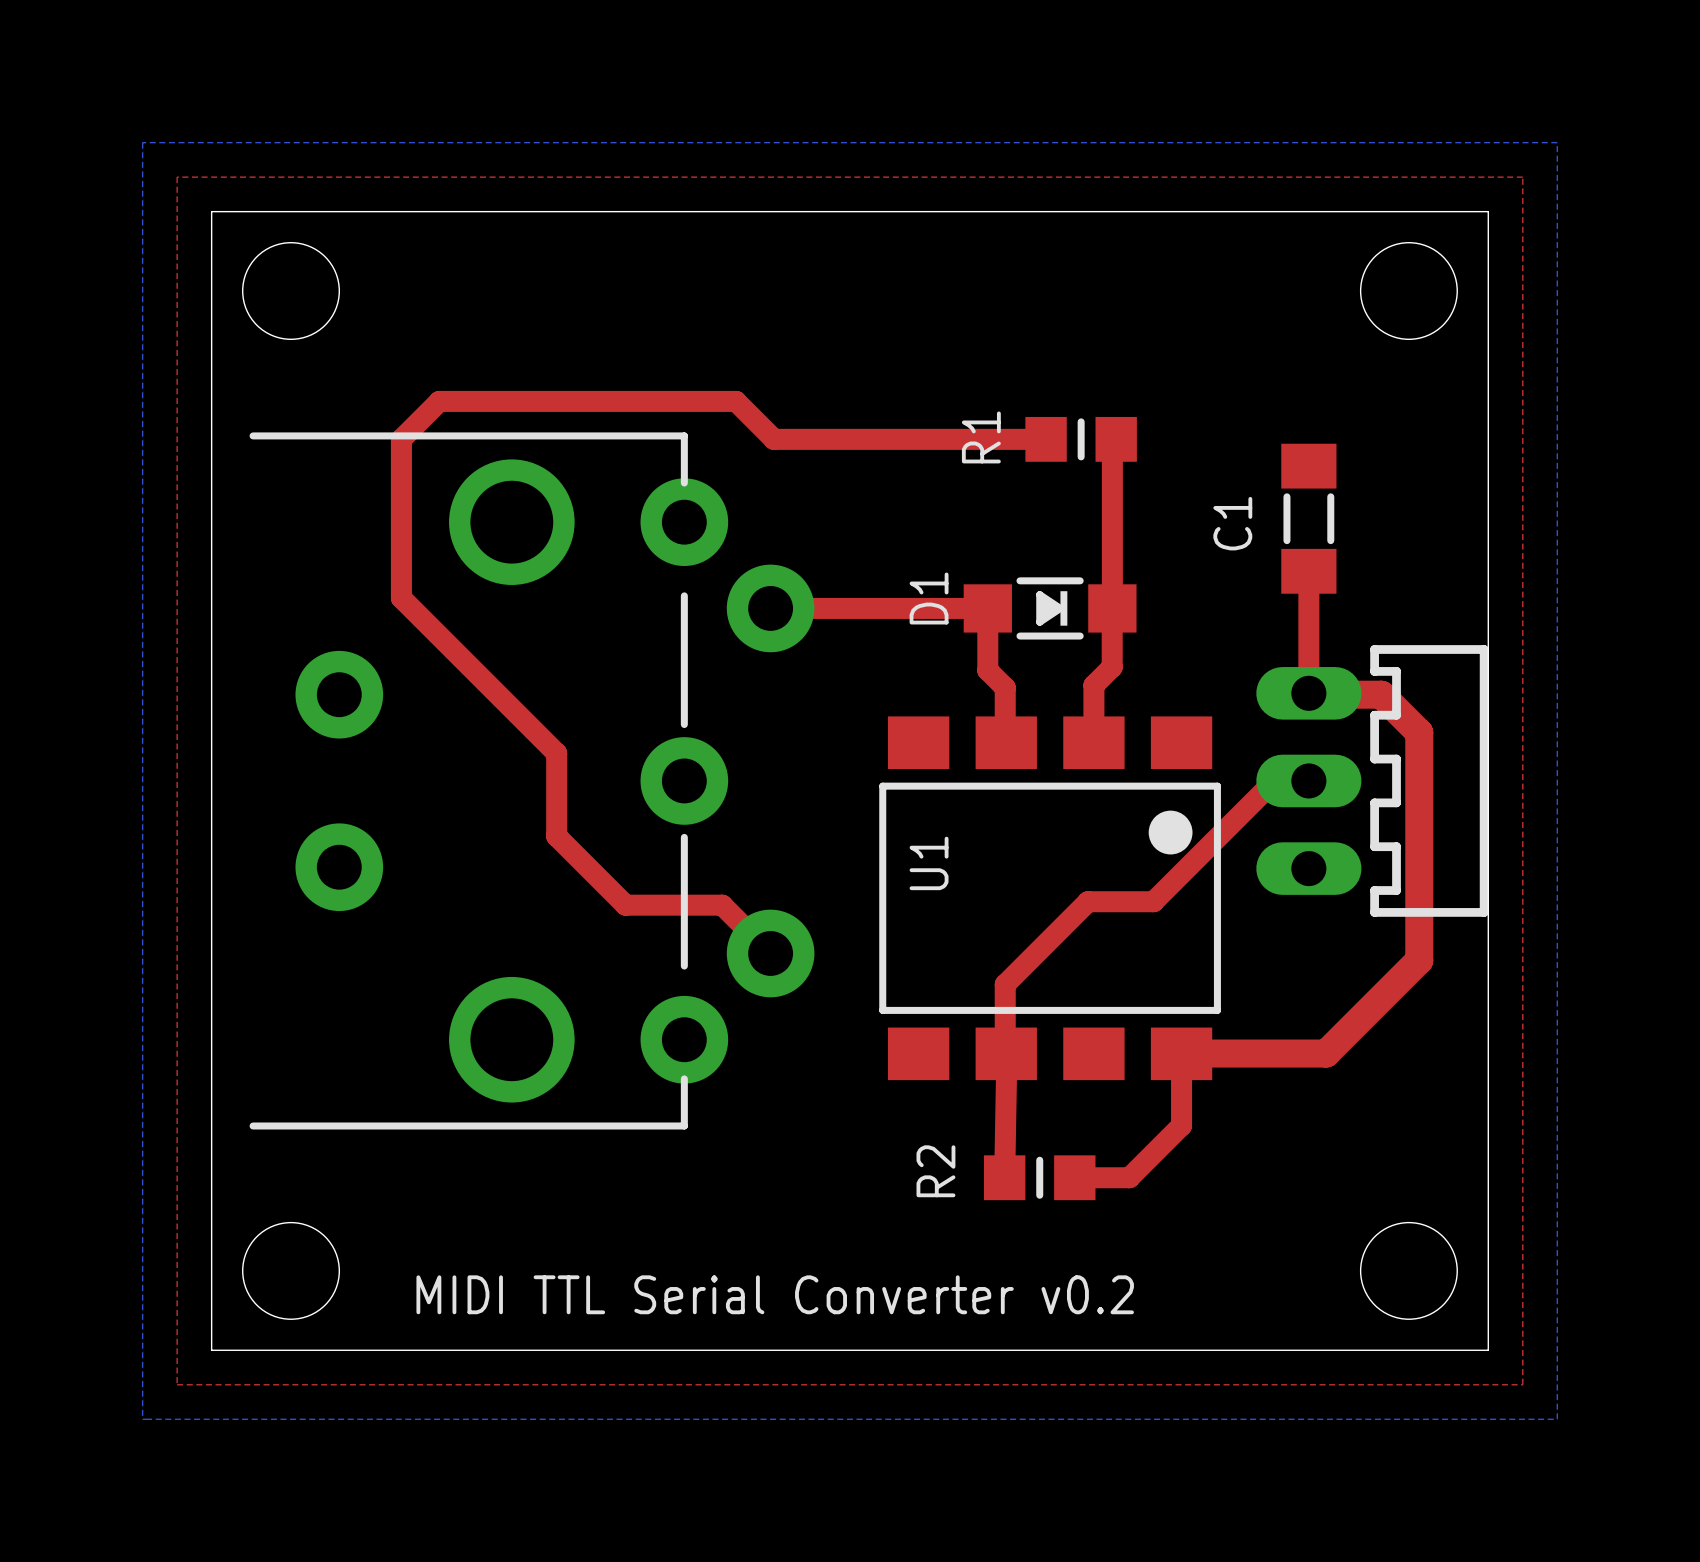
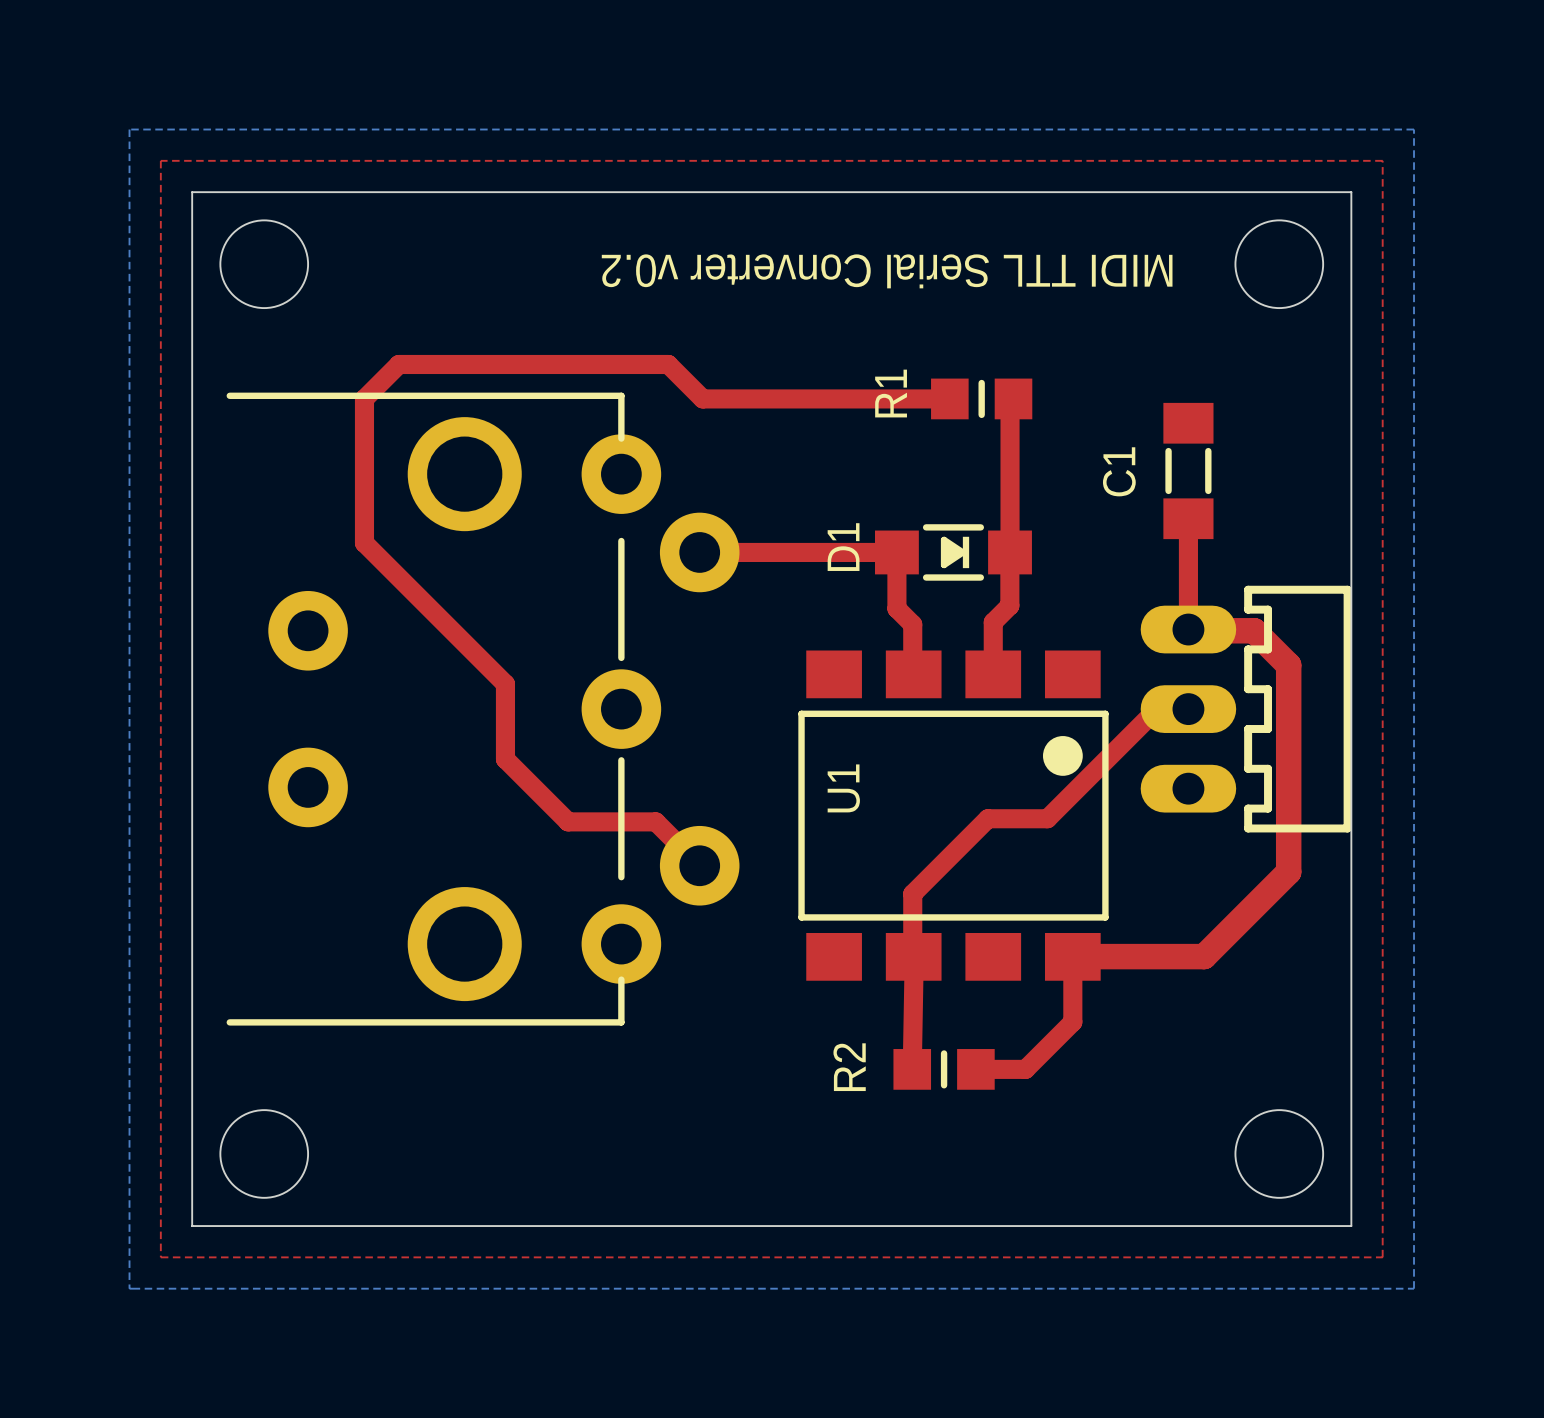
text: none -> MIDI TTL Serial Converter v0.2 (887, 271)
text: MIDI TTL Serial Converter v0.2 (775, 1294) -> none

